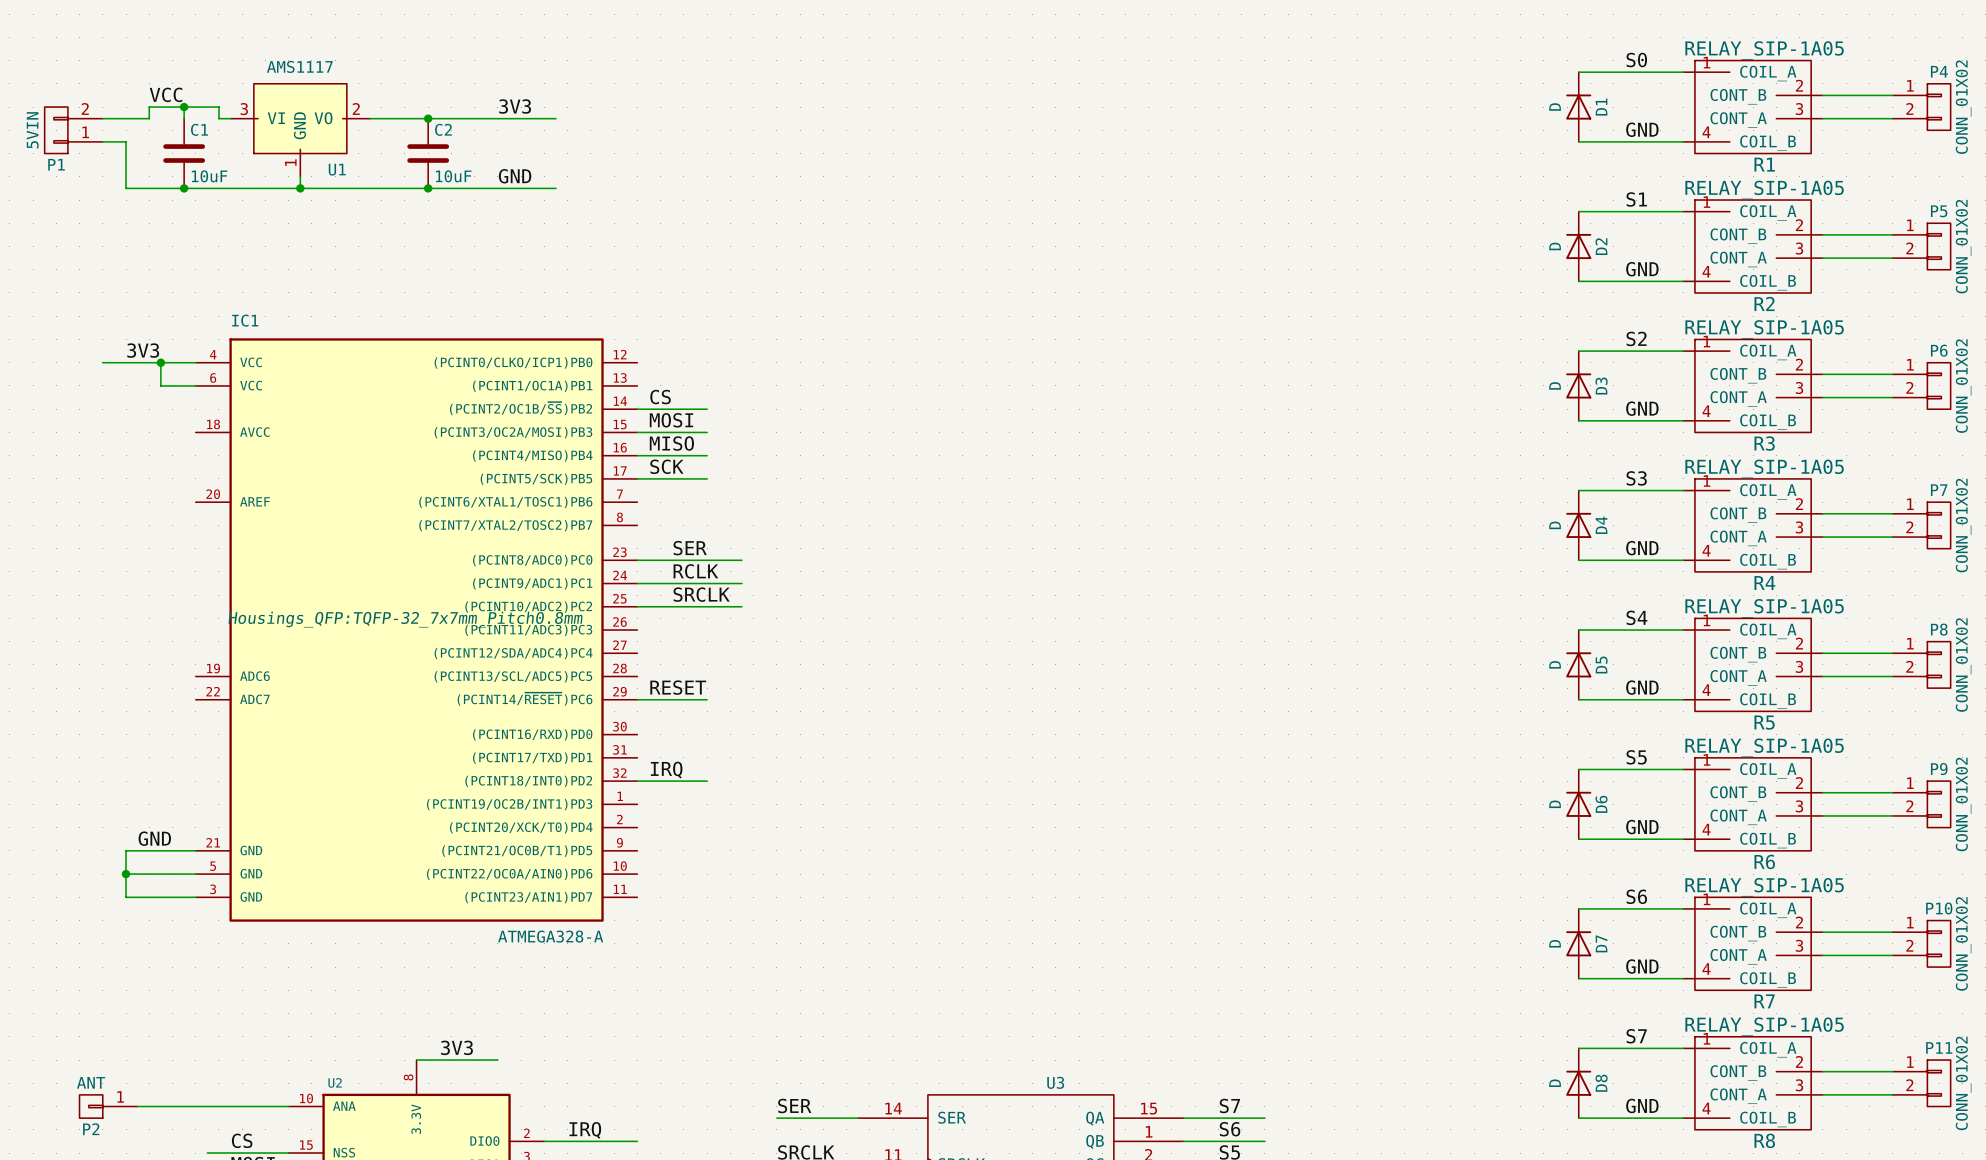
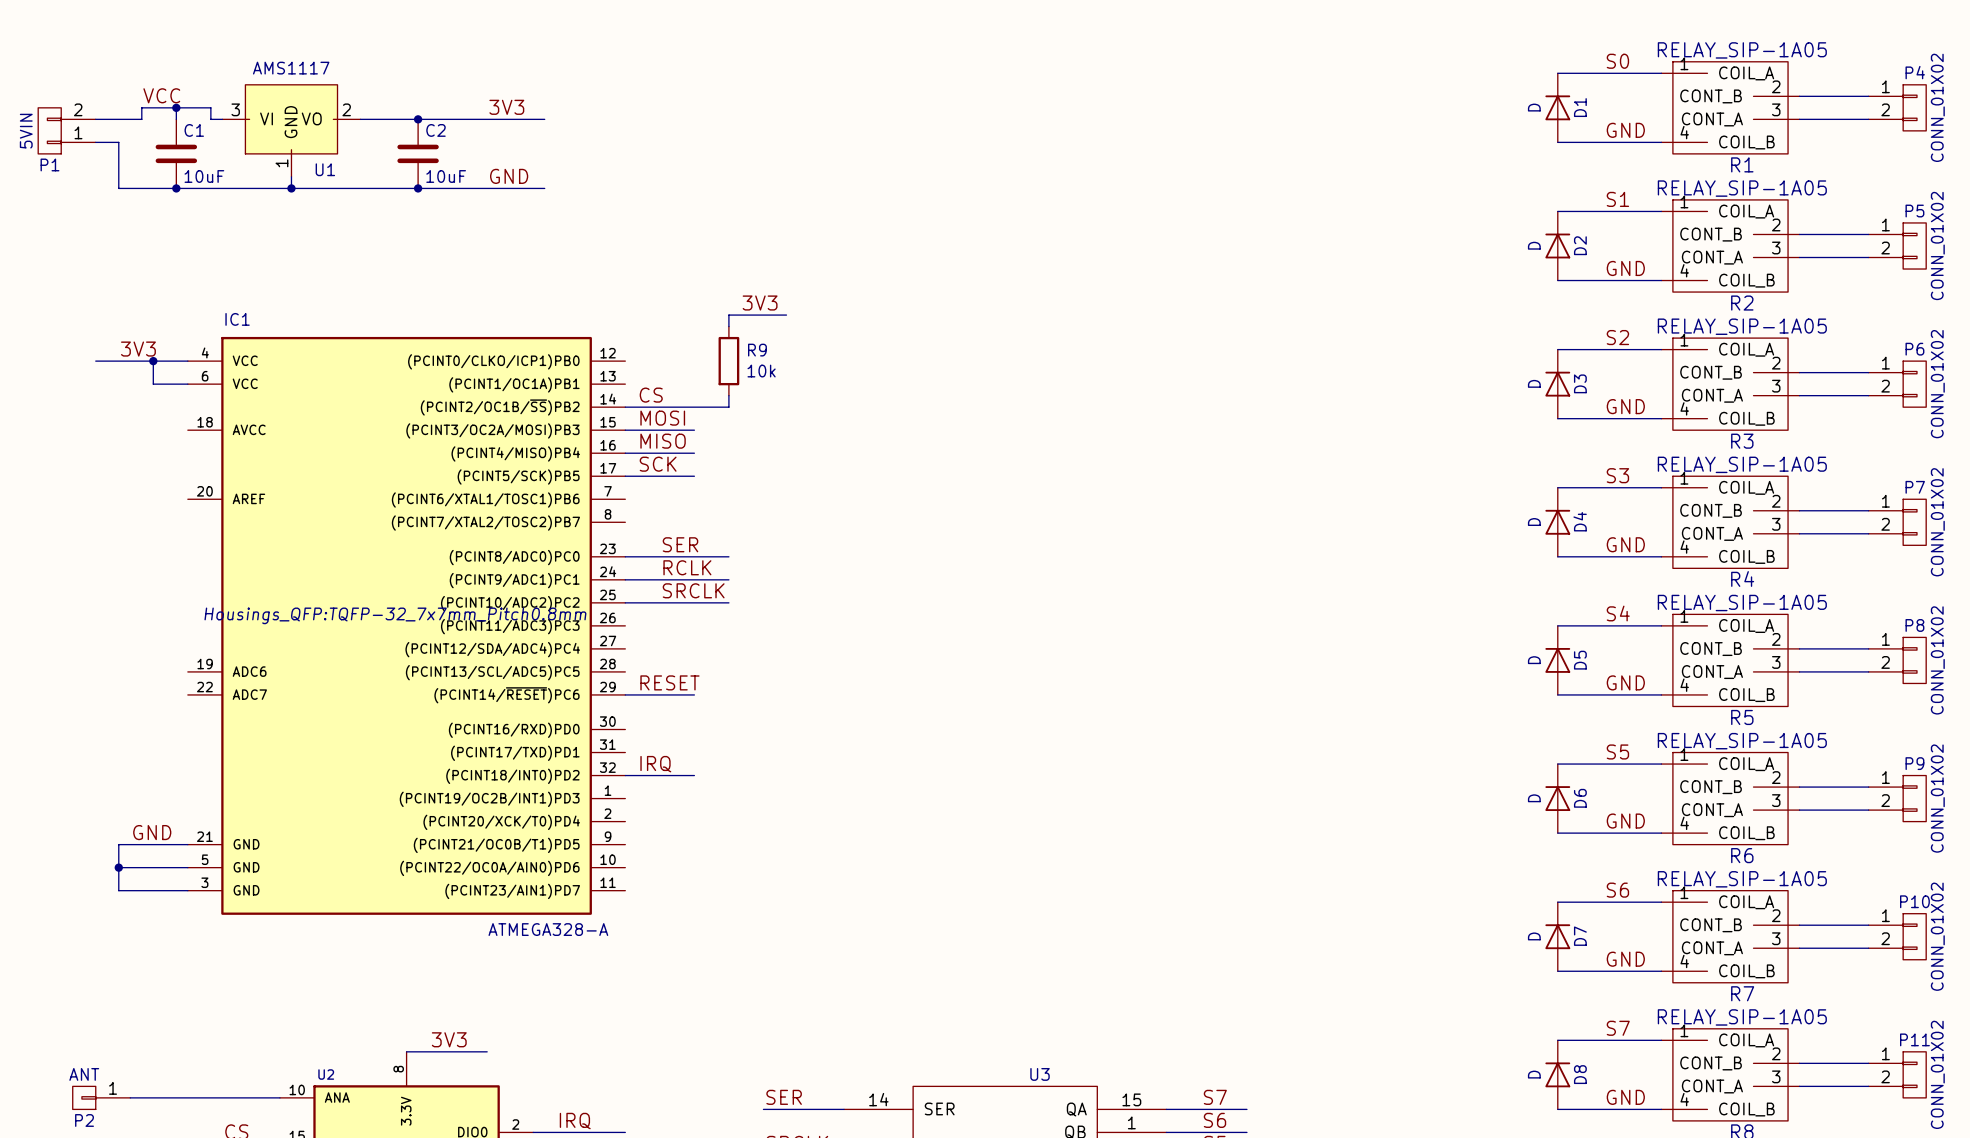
label: none -> 3V3 (760, 303)
wire: none -> (786, 315) (728, 315) (728, 326)
R9: none -> 10k (728, 361)
wire: none -> (728, 395) (728, 407) (694, 407)

